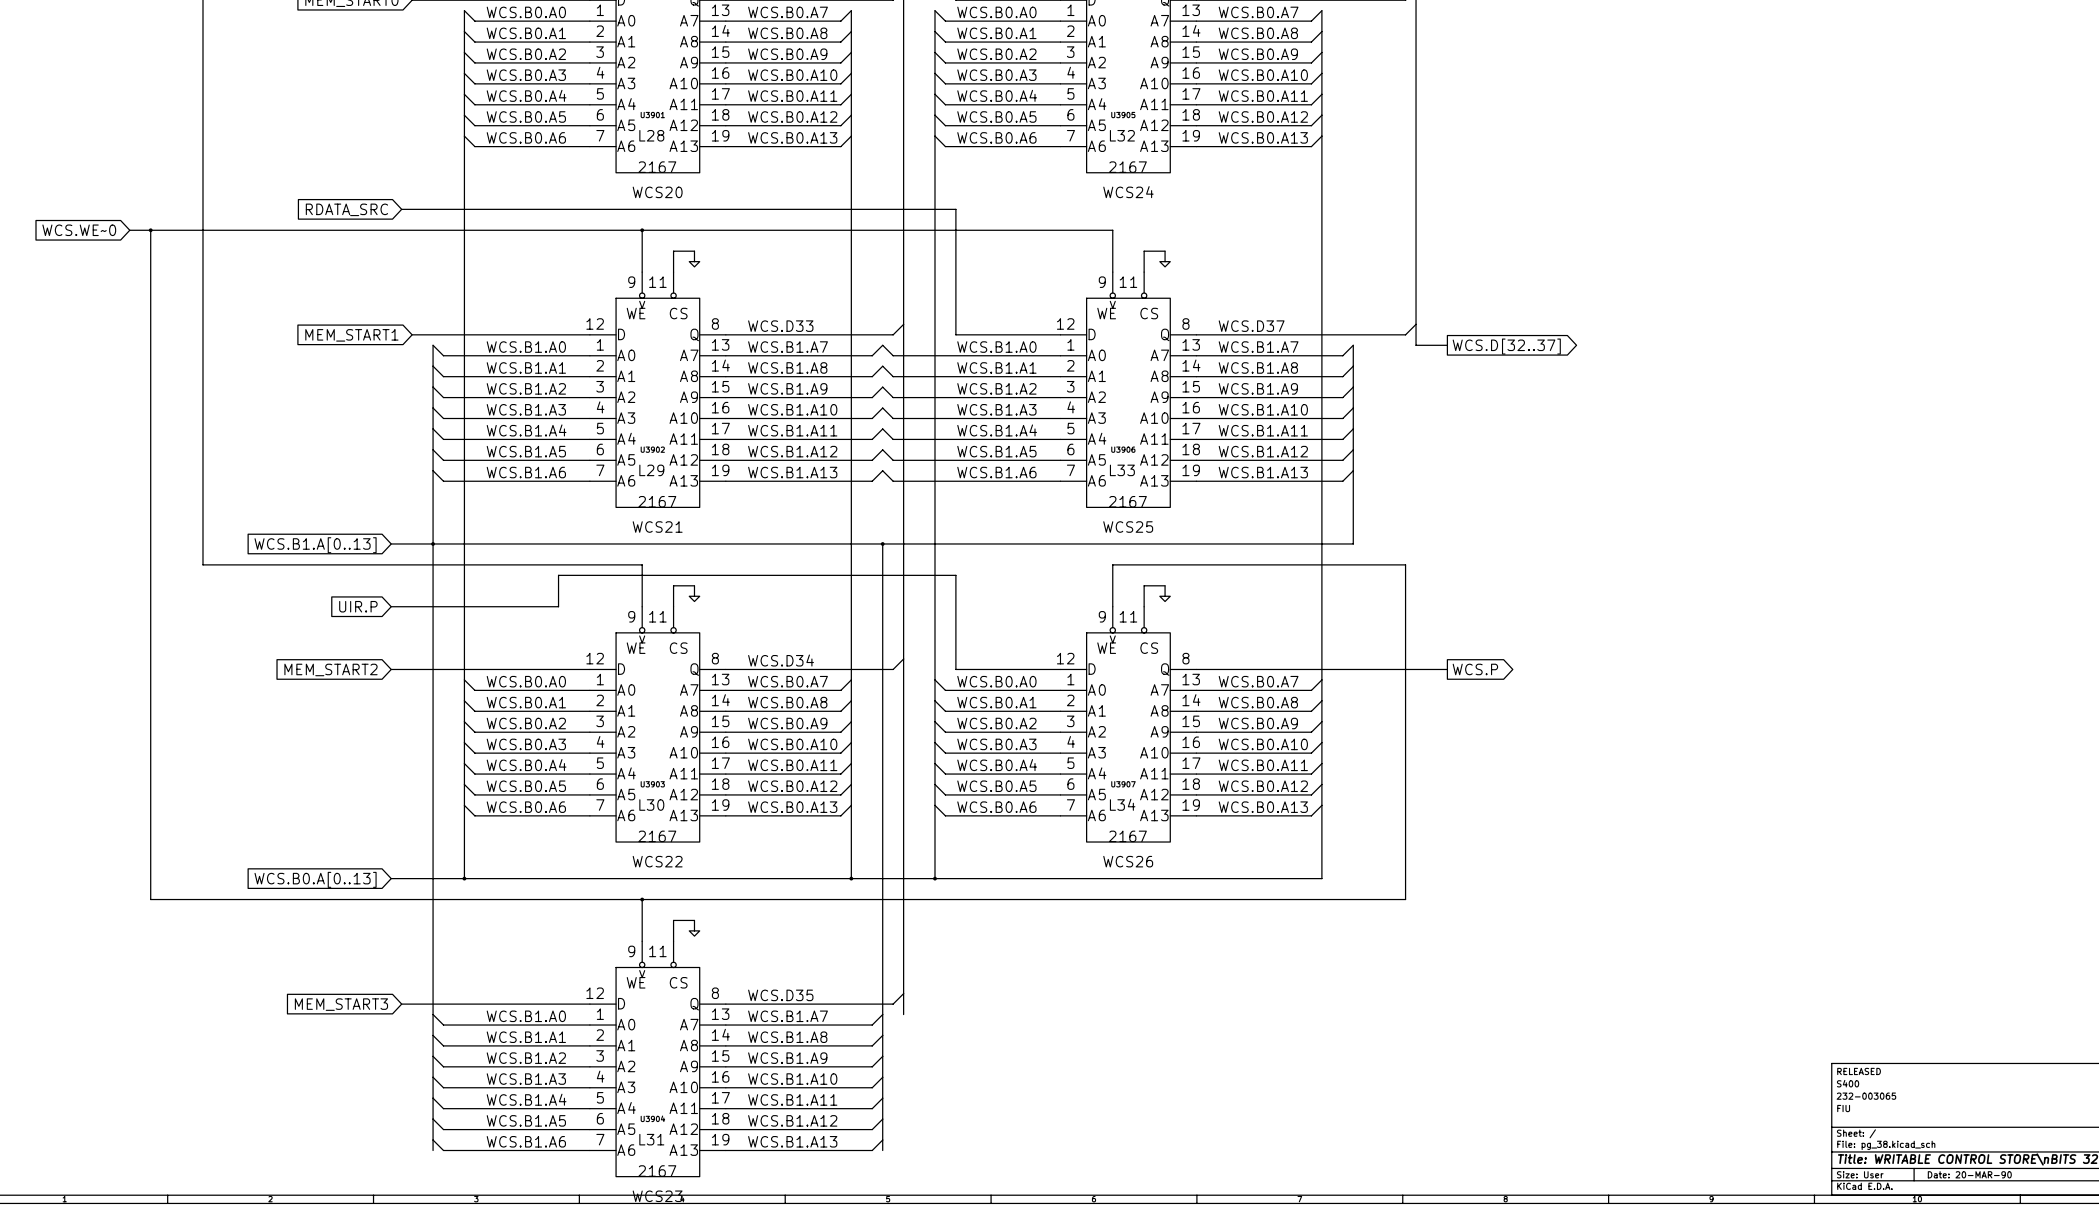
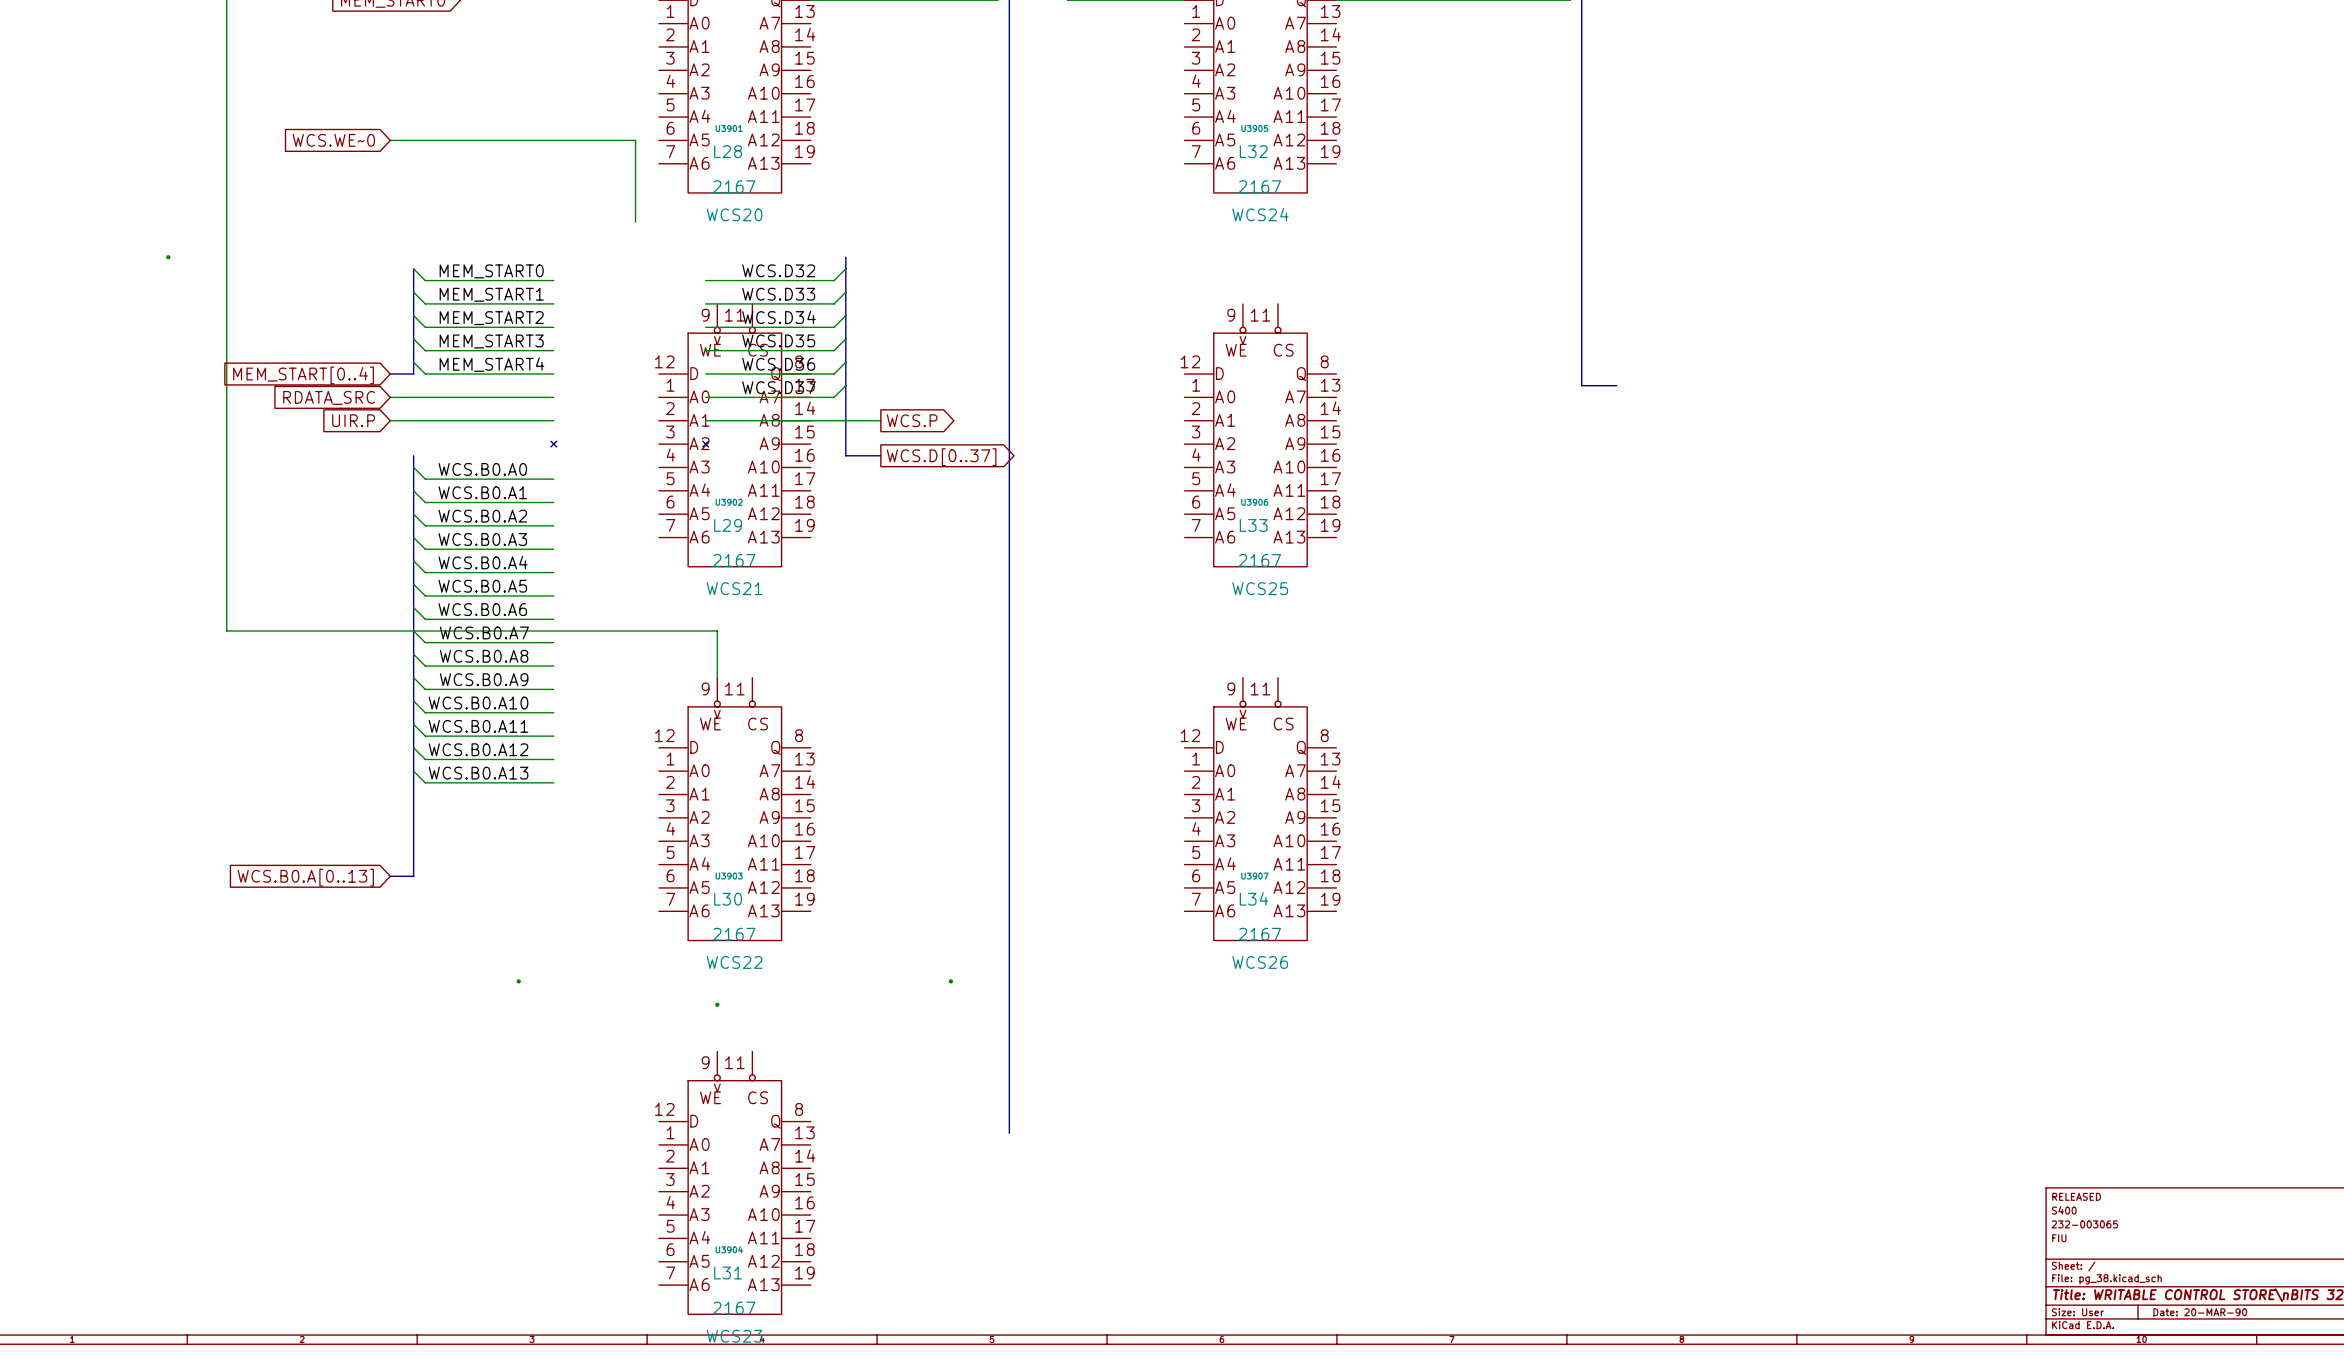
wire: (412, 0) (589, 0) -> none
wire: (464, 10) (474, 21) (589, 21) -> none
bus: (464, 10) (464, 878) -> none
wire: (851, 10) (840, 21) (725, 21) -> none
bus: (851, 10) (851, 878) -> none
wire: (934, 10) (945, 21) (1060, 21) -> none
bus: (934, 10) (934, 878) -> none
wire: (1321, 10) (1311, 21) (1196, 21) -> none
bus: (1321, 10) (1321, 878) (391, 878) -> none
label: WCS.B0.A0 (526, 12) -> none
label: WCS.B0.A7 (788, 12) -> none
label: WCS.B0.A0 (996, 12) -> none
label: WCS.B0.A7 (1258, 12) -> none
wire: (464, 31) (474, 42) (589, 42) -> none
wire: (851, 31) (840, 42) (725, 42) -> none
wire: (934, 31) (945, 42) (1060, 42) -> none
wire: (1321, 31) (1311, 42) (1196, 42) -> none
label: WCS.B0.A1 (526, 33) -> none
label: WCS.B0.A8 (787, 33) -> none
label: WCS.B0.A1 (996, 33) -> none
label: WCS.B0.A8 (1258, 33) -> none
wire: (464, 52) (474, 62) (589, 62) -> none
wire: (851, 52) (840, 62) (725, 62) -> none
wire: (934, 52) (945, 62) (1060, 62) -> none
wire: (1321, 52) (1311, 62) (1196, 62) -> none
label: WCS.B0.A2 (526, 54) -> none
label: WCS.B0.A9 (787, 54) -> none
label: WCS.B0.A2 (996, 54) -> none
label: WCS.B0.A9 (1258, 54) -> none
wire: (464, 73) (474, 83) (589, 83) -> none
wire: (851, 73) (840, 83) (725, 83) -> none
wire: (934, 73) (945, 83) (1060, 83) -> none
wire: (1321, 73) (1311, 83) (1196, 83) -> none
label: WCS.B0.A3 (526, 75) -> none
label: WCS.B0.A10 (792, 75) -> none
label: WCS.B0.A3 (996, 75) -> none
label: WCS.B0.A10 (1263, 75) -> none
wire: (464, 94) (474, 104) (589, 104) -> none
wire: (851, 94) (840, 104) (725, 104) -> none
wire: (934, 94) (945, 104) (1060, 104) -> none
wire: (1321, 94) (1311, 104) (1196, 104) -> none
label: WCS.B0.A4 (526, 95) -> none
label: WCS.B0.A4 (997, 95) -> none
label: WCS.B0.A11 (792, 96) -> none
label: WCS.B0.A11 (1263, 96) -> none
wire: (464, 115) (474, 125) -> (390, 140) (530, 140)
wire: (851, 115) (840, 125) (725, 125) -> none
wire: (934, 115) (945, 125) (1060, 125) -> none
wire: (1321, 115) (1311, 125) (1196, 125) -> none
label: WCS.B0.A5 (526, 116) -> none
label: WCS.B0.A12 (792, 116) -> none
label: WCS.B0.A5 (996, 116) -> none
label: WCS.B0.A12 (1263, 116) -> none
global label: none -> WCS.WE~0 (333, 140)
wire: (568, 125) (589, 125) -> (635, 140) (635, 222)
wire: (464, 136) (474, 146) (589, 146) -> none
wire: (851, 136) (840, 146) (725, 146) -> none
wire: (934, 136) (945, 146) (1060, 146) -> none
wire: (1321, 136) (1311, 146) (1196, 146) -> none
label: WCS.B0.A6 (526, 137) -> none
label: WCS.B0.A13 (792, 137) -> none
label: WCS.B0.A6 (996, 137) -> none
label: WCS.B0.A13 (1263, 137) -> none
global label: RDATA_SRC (346, 209) -> none
wire: (401, 209) (955, 209) (955, 334) (1060, 334) -> none
global label: WCS.WE~0 (79, 230) -> none
wire: (129, 230) (1112, 230) (1112, 272) -> none
wire: (150, 230) (150, 899) (1405, 899) (1405, 564) (1112, 564) (1112, 606) -> none
wire: (642, 230) (642, 272) -> none
junction: (642, 230) -> none
bus: none -> (845, 257) (845, 455) (880, 455)
wire: none -> (413, 268) (425, 280) (553, 280)
bus: none -> (413, 268) (413, 374) (390, 374)
wire: none -> (845, 268) (834, 280) (775, 280)
label: none -> MEM_START0 (491, 271)
label: none -> WCS.D32 (778, 270)
wire: (673, 251) (673, 272) -> (752, 280) (705, 280)
wire: (1165, 251) (1144, 251) (1144, 272) -> none
power symbol: (694, 259) -> none
power symbol: (1165, 259) -> none
wire: none -> (413, 292) (425, 303) (553, 303)
wire: none -> (845, 292) (834, 303) (705, 303)
label: none -> MEM_START1 (491, 294)
label: none -> WCS.D33 (778, 294)
wire: none -> (413, 315) (425, 327) (553, 327)
wire: none -> (845, 315) (834, 327) (705, 327)
label: none -> MEM_START2 (491, 318)
label: none -> WCS.D34 (778, 317)
wire: none -> (413, 338) (425, 350) (553, 350)
wire: none -> (845, 338) (834, 350) (705, 350)
label: none -> MEM_START3 (491, 341)
label: none -> WCS.D35 (778, 340)
wire: none -> (413, 362) (425, 374) (460, 374)
wire: (903, 324) (893, 334) (746, 334) -> (845, 362) (834, 374)
wire: (1416, 324) (1405, 334) (1196, 334) -> none
label: none -> MEM_START4 (491, 364)
label: none -> WCS.D36 (778, 364)
label: WCS.D33 (780, 326) -> none
label: WCS.D37 (1251, 326) -> none
wire: (495, 334) (589, 334) -> none
wire: none -> (705, 374) (810, 374)
global label: MEM_START1 (351, 335) -> MEM_START[0..4] (303, 375)
wire: (433, 345) (443, 355) -> (390, 397) (495, 397)
bus: (433, 345) (433, 1150) -> none
wire: (1353, 345) (1342, 355) (1196, 355) -> none
bus: (1353, 345) (1353, 543) (391, 543) -> none
global label: WCS.D[32..37] (1506, 346) -> none
label: WCS.B1.A0 (526, 347) -> none
label: none -> WCS.D37 (778, 387)
label: WCS.B1.A7 (788, 347) -> none
label: WCS.B1.A0 (996, 347) -> none
label: WCS.B1.A7 (1258, 347) -> none
wire: (495, 355) (589, 355) -> none
wire: none -> (705, 397) (810, 397)
wire: (746, 355) (872, 355) (882, 345) (893, 355) (1060, 355) -> (834, 397) (845, 385)
global label: none -> RDATA_SRC (329, 397)
wire: (433, 366) (443, 376) -> (390, 420) (495, 420)
wire: (1353, 366) (1342, 376) (1196, 376) -> none
label: WCS.B1.A1 (526, 367) -> none
label: WCS.B1.A8 (787, 367) -> none
label: WCS.B1.A1 (996, 367) -> none
label: WCS.B1.A8 (1258, 367) -> none
global label: none -> UIR.P (353, 420)
wire: (495, 376) (589, 376) -> none
wire: none -> (705, 420) (810, 420)
wire: (788, 376) (872, 376) (882, 366) (893, 376) (1060, 376) -> none
global label: none -> WCS.P (912, 420)
wire: (433, 387) (443, 397) (589, 397) -> none
wire: (1353, 387) (1342, 397) (1196, 397) -> none
label: WCS.B1.A2 (526, 388) -> none
label: WCS.B1.A9 (787, 388) -> none
label: WCS.B1.A2 (996, 388) -> none
label: WCS.B1.A9 (1258, 388) -> none
no-connect mark: none -> (553, 444)
no-connect mark: none -> (705, 444)
wire: (725, 397) (872, 397) (882, 387) (893, 397) (1060, 397) -> none
bus: none -> (413, 455) (413, 876) (390, 876)
wire: (433, 408) (443, 418) (589, 418) -> none
wire: (1353, 408) (1342, 418) (1196, 418) -> none
label: WCS.B1.A3 (526, 409) -> none
label: WCS.B1.A10 (792, 409) -> none
global label: none -> WCS.D[0..37] (941, 457)
label: WCS.B1.A3 (996, 409) -> none
label: WCS.B1.A10 (1263, 409) -> none
wire: none -> (413, 467) (425, 479) (553, 479)
wire: (725, 418) (872, 418) (882, 408) (893, 418) (1060, 418) -> none
label: none -> WCS.B0.A0 (482, 469)
wire: (433, 428) (443, 439) (589, 439) -> none
wire: (1353, 428) (1342, 439) (1196, 439) -> none
label: WCS.B1.A4 (526, 430) -> none
label: WCS.B1.A11 (792, 430) -> none
label: WCS.B1.A4 (997, 430) -> none
label: WCS.B1.A11 (1263, 430) -> none
wire: none -> (413, 490) (425, 502) (553, 502)
wire: (725, 439) (872, 439) (882, 428) (893, 439) (1060, 439) -> none
label: none -> WCS.B0.A1 (482, 492)
wire: (433, 449) (443, 460) (589, 460) -> none
wire: (1353, 449) (1342, 460) (1196, 460) -> none
label: WCS.B1.A5 (526, 451) -> none
label: WCS.B1.A12 (792, 451) -> none
label: WCS.B1.A5 (996, 451) -> none
label: WCS.B1.A12 (1263, 451) -> none
wire: none -> (413, 514) (425, 525) (553, 525)
wire: (725, 460) (872, 460) (882, 449) (893, 460) (1060, 460) -> none
label: none -> WCS.B0.A2 (482, 516)
wire: (433, 470) (443, 481) (589, 481) -> none
wire: (1353, 470) (1342, 481) (1196, 481) -> none
label: WCS.B1.A6 (526, 472) -> none
label: WCS.B1.A13 (792, 472) -> none
label: WCS.B1.A6 (996, 472) -> none
label: WCS.B1.A13 (1263, 472) -> none
wire: none -> (413, 537) (425, 549) (553, 549)
wire: (725, 481) (872, 481) (882, 470) (893, 481) (1060, 481) -> none
label: none -> WCS.B0.A3 (482, 539)
wire: none -> (413, 560) (425, 572) (553, 572)
label: none -> WCS.B0.A4 (483, 562)
wire: none -> (413, 584) (425, 595) (553, 595)
label: none -> WCS.B0.A5 (482, 586)
wire: none -> (413, 607) (425, 619) (553, 619)
junction: (433, 543) -> none
bus: (882, 543) (882, 1150) -> none
junction: (882, 543) -> none
global label: WCS.B1.A[0..13] (315, 545) -> none
label: none -> WCS.B0.A6 (482, 609)
wire: none -> (413, 630) (425, 642) (553, 642)
label: none -> WCS.B0.A7 (484, 632)
wire: none -> (413, 654) (425, 666) (553, 666)
wire: (694, 585) (673, 585) (673, 606) -> none
wire: (1165, 585) (1144, 585) (1144, 606) -> none
label: none -> WCS.B0.A8 (484, 656)
power symbol: (694, 593) -> none
power symbol: (1165, 593) -> none
global label: UIR.P (358, 606) -> none
wire: none -> (413, 677) (425, 689) (553, 689)
wire: (391, 606) (558, 606) (558, 575) (955, 575) (955, 669) (1060, 669) -> none
label: none -> WCS.B0.A9 (484, 679)
wire: none -> (413, 701) (425, 712) (553, 712)
label: none -> WCS.B0.A10 (478, 703)
label: none -> WCS.B0.A11 (478, 726)
wire: (903, 659) (893, 669) (725, 669) -> none
label: WCS.D34 (781, 660) -> none
global label: MEM_START2 (330, 669) -> none
wire: (391, 669) (589, 669) -> none
wire: (1196, 669) (1447, 669) -> none
global label: WCS.P (1475, 669) -> none
label: none -> WCS.B0.A12 (478, 749)
wire: (464, 679) (474, 690) (589, 690) -> (413, 724) (425, 736) (553, 736)
wire: (851, 679) (840, 690) (725, 690) -> none
wire: (934, 679) (945, 690) (1060, 690) -> none
wire: (1321, 679) (1311, 690) (1196, 690) -> none
label: WCS.B0.A0 (526, 681) -> none
label: WCS.B0.A7 (788, 681) -> none
label: WCS.B0.A0 (996, 681) -> none
label: WCS.B0.A7 (1258, 681) -> none
label: none -> WCS.B0.A13 (478, 773)
wire: (464, 700) (474, 711) (589, 711) -> (413, 747) (425, 759) (553, 759)
wire: (851, 700) (840, 711) (725, 711) -> none
wire: (934, 700) (945, 711) (1060, 711) -> none
wire: (1321, 700) (1311, 711) (1196, 711) -> none
label: WCS.B0.A1 (526, 702) -> none
label: WCS.B0.A8 (787, 702) -> none
label: WCS.B0.A1 (996, 702) -> none
label: WCS.B0.A8 (1258, 702) -> none
wire: (464, 721) (474, 732) (589, 732) -> (413, 771) (425, 782) (553, 782)
wire: (851, 721) (840, 732) (725, 732) -> none
wire: (934, 721) (945, 732) (1060, 732) -> none
wire: (1321, 721) (1311, 732) (1196, 732) -> none
label: WCS.B0.A2 (526, 723) -> none
label: WCS.B0.A9 (787, 723) -> none
label: WCS.B0.A2 (996, 723) -> none
label: WCS.B0.A9 (1258, 723) -> none
wire: (464, 742) (474, 753) (589, 753) -> none
wire: (851, 742) (840, 753) (725, 753) -> none
wire: (934, 742) (945, 753) (1060, 753) -> none
wire: (1321, 742) (1311, 753) (1196, 753) -> none
label: WCS.B0.A3 (526, 744) -> none
label: WCS.B0.A10 (792, 744) -> none
label: WCS.B0.A3 (996, 744) -> none
label: WCS.B0.A10 (1263, 744) -> none
wire: (464, 763) (474, 774) (589, 774) -> none
wire: (851, 763) (840, 774) (725, 774) -> none
wire: (934, 763) (945, 774) (1060, 774) -> none
wire: (1321, 763) (1311, 774) (1196, 774) -> none
label: WCS.B0.A4 (526, 765) -> none
label: WCS.B0.A11 (792, 765) -> none
label: WCS.B0.A4 (997, 765) -> none
label: WCS.B0.A11 (1263, 765) -> none
wire: (464, 784) (474, 794) (589, 794) -> none
wire: (851, 784) (840, 794) (725, 794) -> none
wire: (934, 784) (945, 794) (1060, 794) -> none
wire: (1321, 784) (1311, 794) (1196, 794) -> none
global label: none -> WCS.B0.A[0..13] (305, 877)
label: WCS.B0.A5 (526, 786) -> none
label: WCS.B0.A12 (792, 786) -> none
label: WCS.B0.A5 (996, 786) -> none
label: WCS.B0.A12 (1263, 786) -> none
wire: (464, 805) (474, 815) (589, 815) -> none
wire: (851, 805) (840, 815) (725, 815) -> none
wire: (934, 805) (945, 815) (1060, 815) -> none
wire: (1321, 805) (1311, 815) (1196, 815) -> none
label: WCS.B0.A6 (526, 807) -> none
label: WCS.B0.A13 (792, 807) -> none
label: WCS.B0.A6 (996, 807) -> none
label: WCS.B0.A13 (1263, 807) -> none
junction: (934, 878) -> none
global label: WCS.B0.A[0..13] (315, 879) -> none
wire: (642, 899) (642, 941) -> none
wire: (694, 920) (673, 920) (673, 941) -> none
power symbol: (694, 928) -> none
wire: (903, 993) (893, 1004) (725, 1004) -> none
label: WCS.D35 (780, 995) -> none
global label: MEM_START3 (341, 1004) -> none
wire: (401, 1004) (589, 1004) -> none
wire: (433, 1014) (443, 1025) (589, 1025) -> none
wire: (882, 1014) (872, 1025) (725, 1025) -> none
label: WCS.B1.A0 (526, 1016) -> none
label: WCS.B1.A7 (788, 1016) -> none
wire: (433, 1035) (443, 1045) (589, 1045) -> none
wire: (882, 1035) (872, 1045) (725, 1045) -> none
label: WCS.B1.A1 (526, 1037) -> none
label: WCS.B1.A8 (787, 1037) -> none
wire: (433, 1056) (443, 1066) (589, 1066) -> none
wire: (882, 1056) (872, 1066) (725, 1066) -> none
label: WCS.B1.A2 (526, 1058) -> none
label: WCS.B1.A9 (787, 1058) -> none
wire: (433, 1077) (443, 1087) (589, 1087) -> none
wire: (882, 1077) (872, 1087) (725, 1087) -> none
label: WCS.B1.A3 (526, 1079) -> none
label: WCS.B1.A10 (792, 1079) -> none
wire: (433, 1098) (443, 1108) (589, 1108) -> none
wire: (882, 1098) (872, 1108) (725, 1108) -> none
label: WCS.B1.A4 (526, 1099) -> none
label: WCS.B1.A11 (792, 1099) -> none
wire: (433, 1119) (443, 1129) (589, 1129) -> none
wire: (882, 1119) (872, 1129) (725, 1129) -> none
label: WCS.B1.A5 (526, 1120) -> none
label: WCS.B1.A12 (792, 1120) -> none
wire: (433, 1140) (443, 1150) (589, 1150) -> none
wire: (882, 1140) (872, 1150) (725, 1150) -> none
label: WCS.B1.A6 (526, 1141) -> none
label: WCS.B1.A13 (792, 1141) -> none

